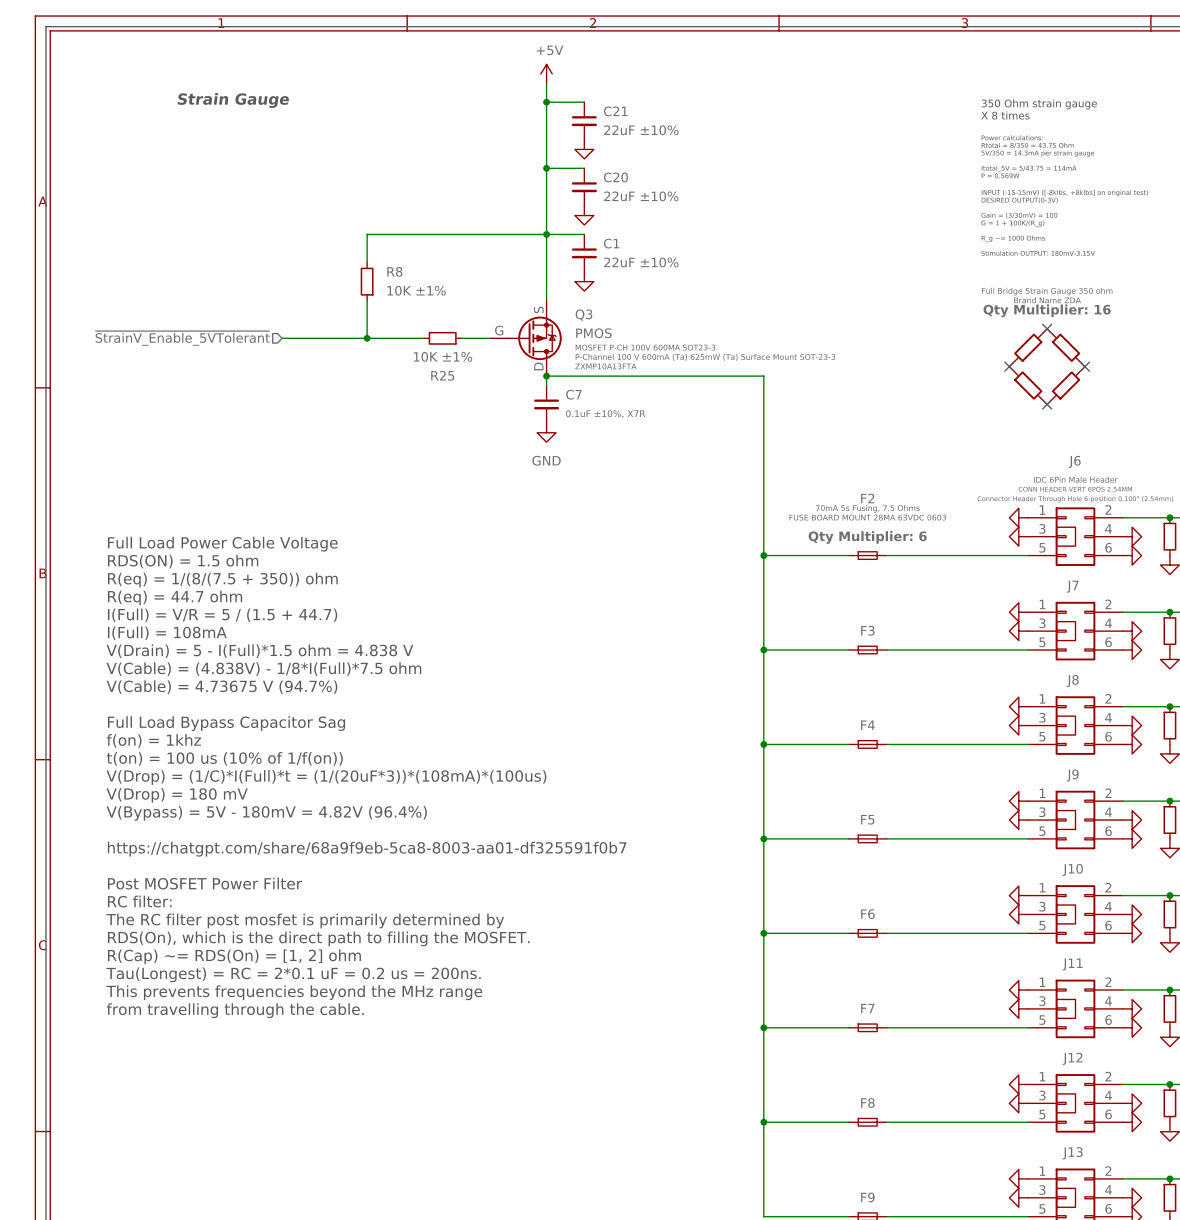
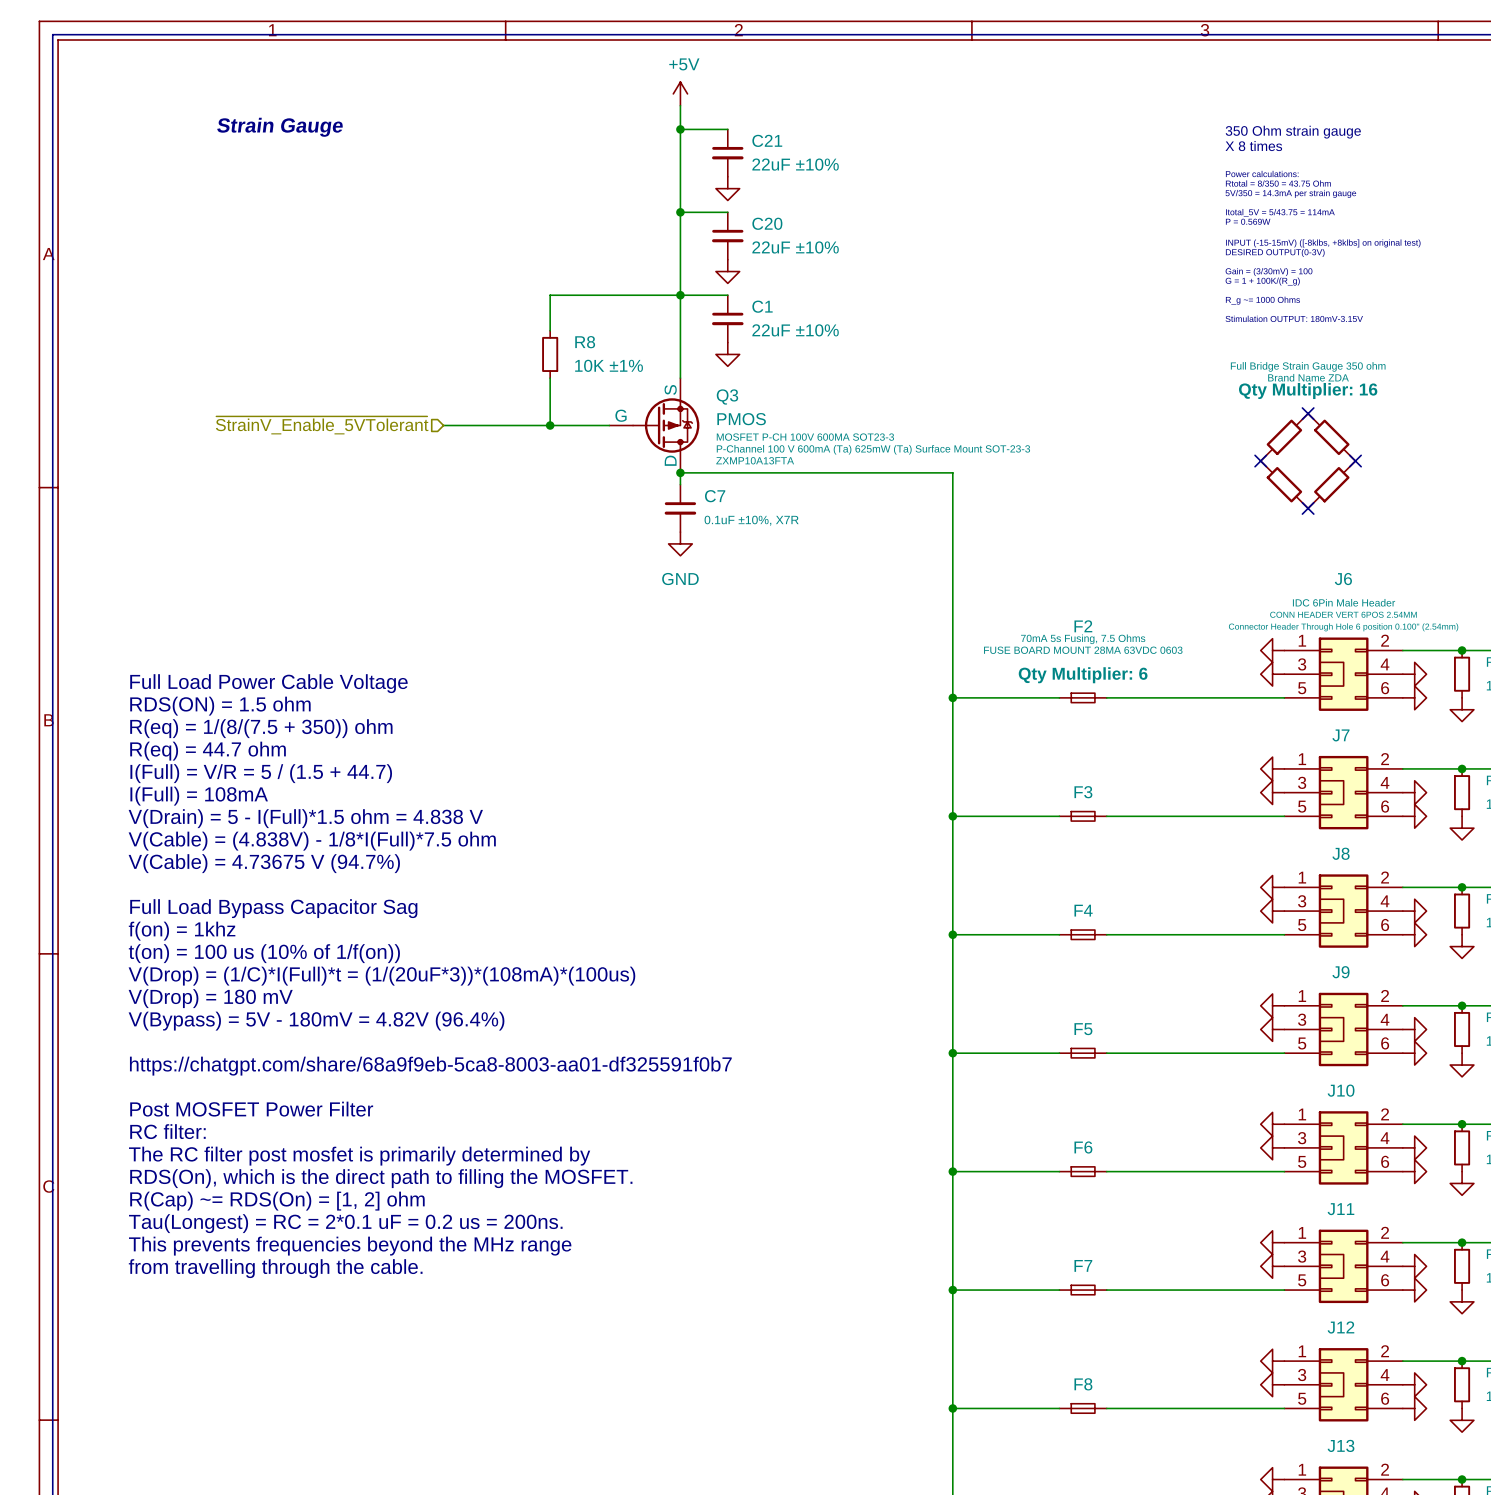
wire: (442, 234) (367, 234) (367, 262) -> (550, 295) (550, 330)
R8 position: (367, 281) -> (550, 354)
wire: (367, 300) (367, 338) -> (550, 378) (550, 425)
hierarchical label position: ~{StrainV_Enable_5VTolerant} (182, 338) -> ~{StrainV_Enable_5VTolerant} (322, 425)
wire: (282, 338) (357, 338) -> none
junction: (367, 338) -> none
wire: none -> (526, 425) (573, 425)
junction: none -> (550, 425)
R25: 10K ±1% (442, 338) -> none

